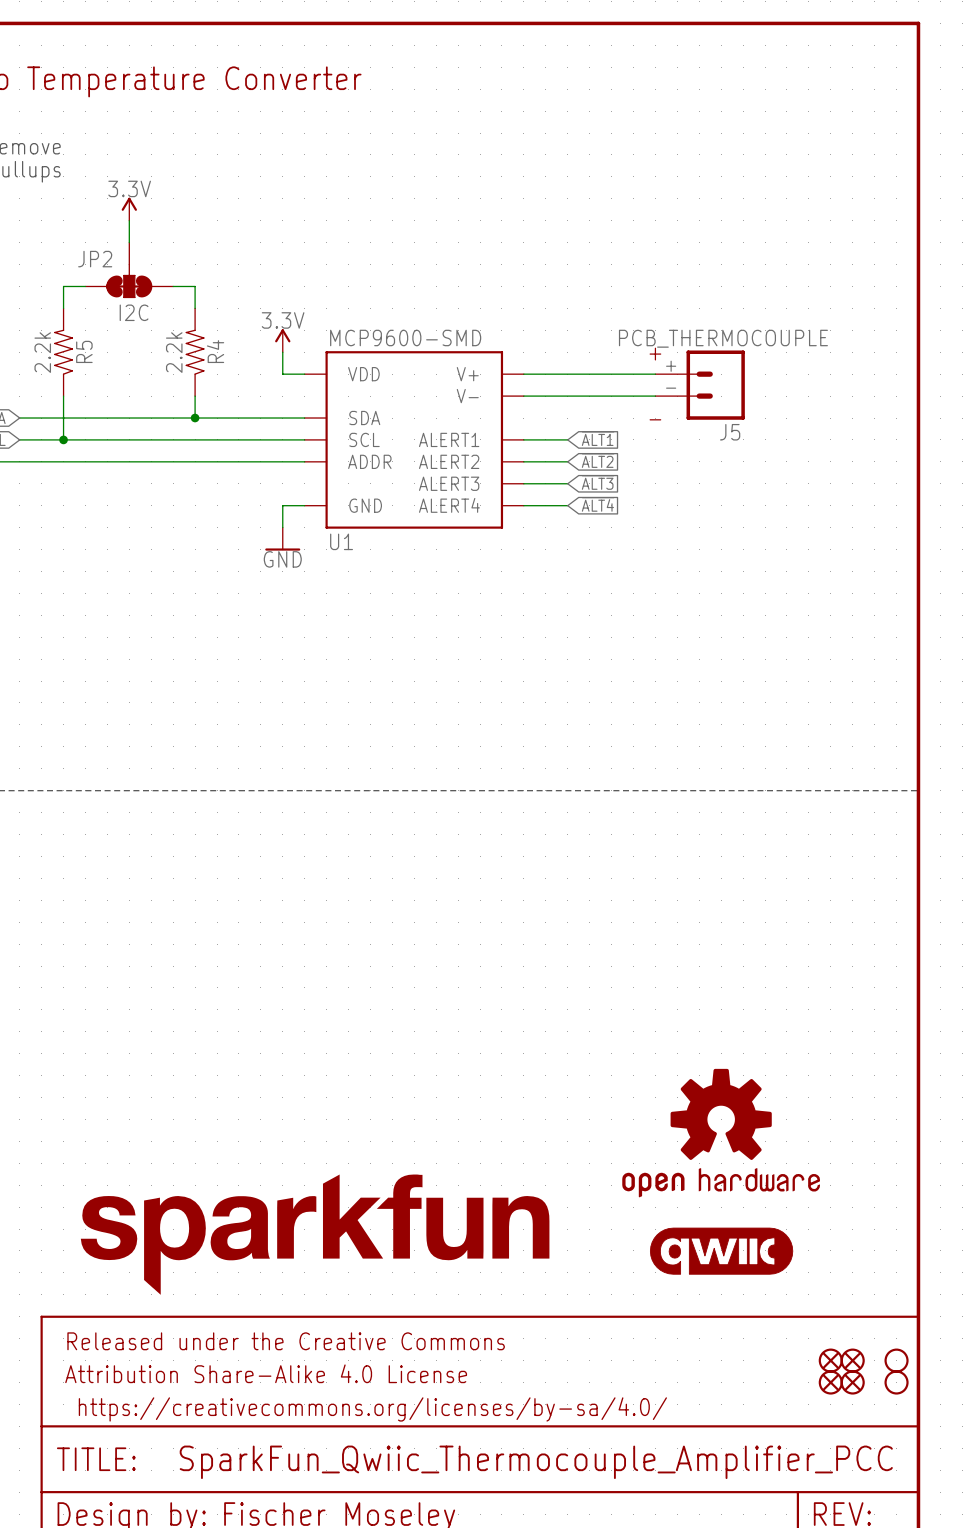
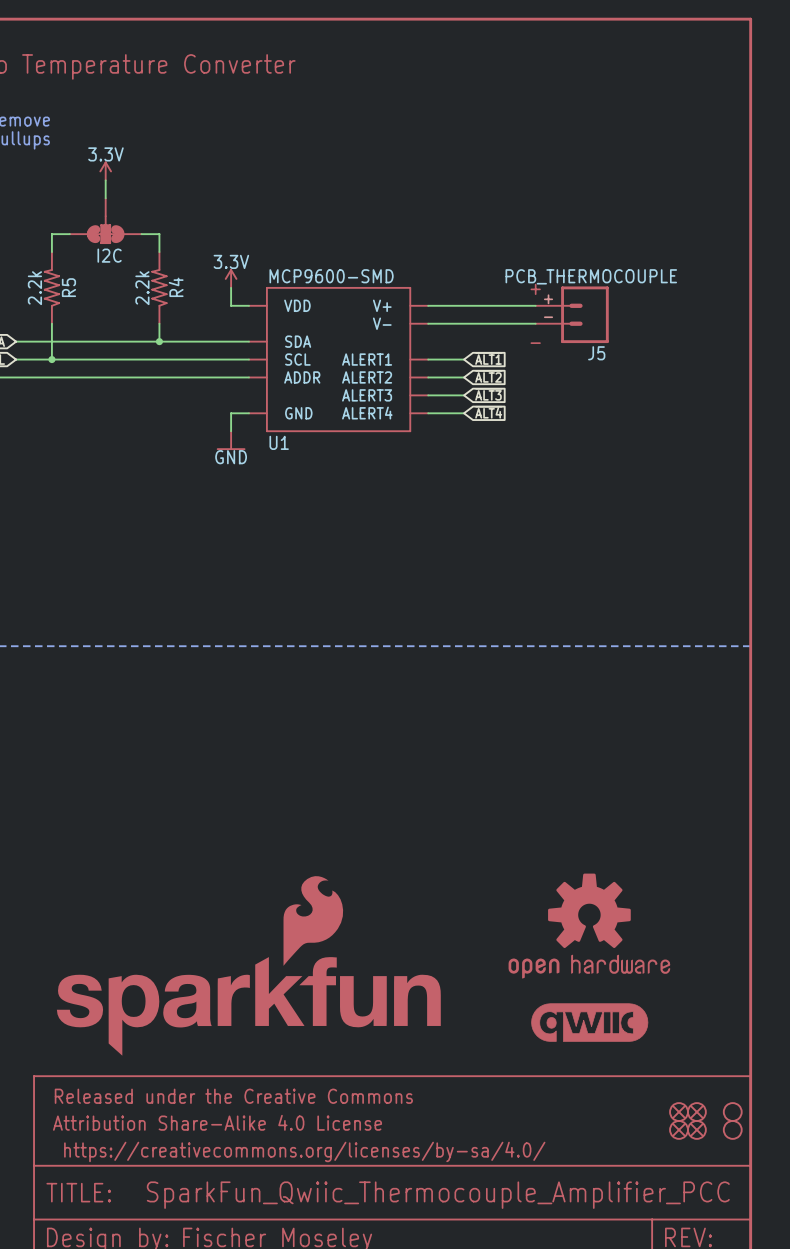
JP2 name: JP2 (95, 259) -> none
part: none -> (248, 965)
part: (315, 1234) -> none

